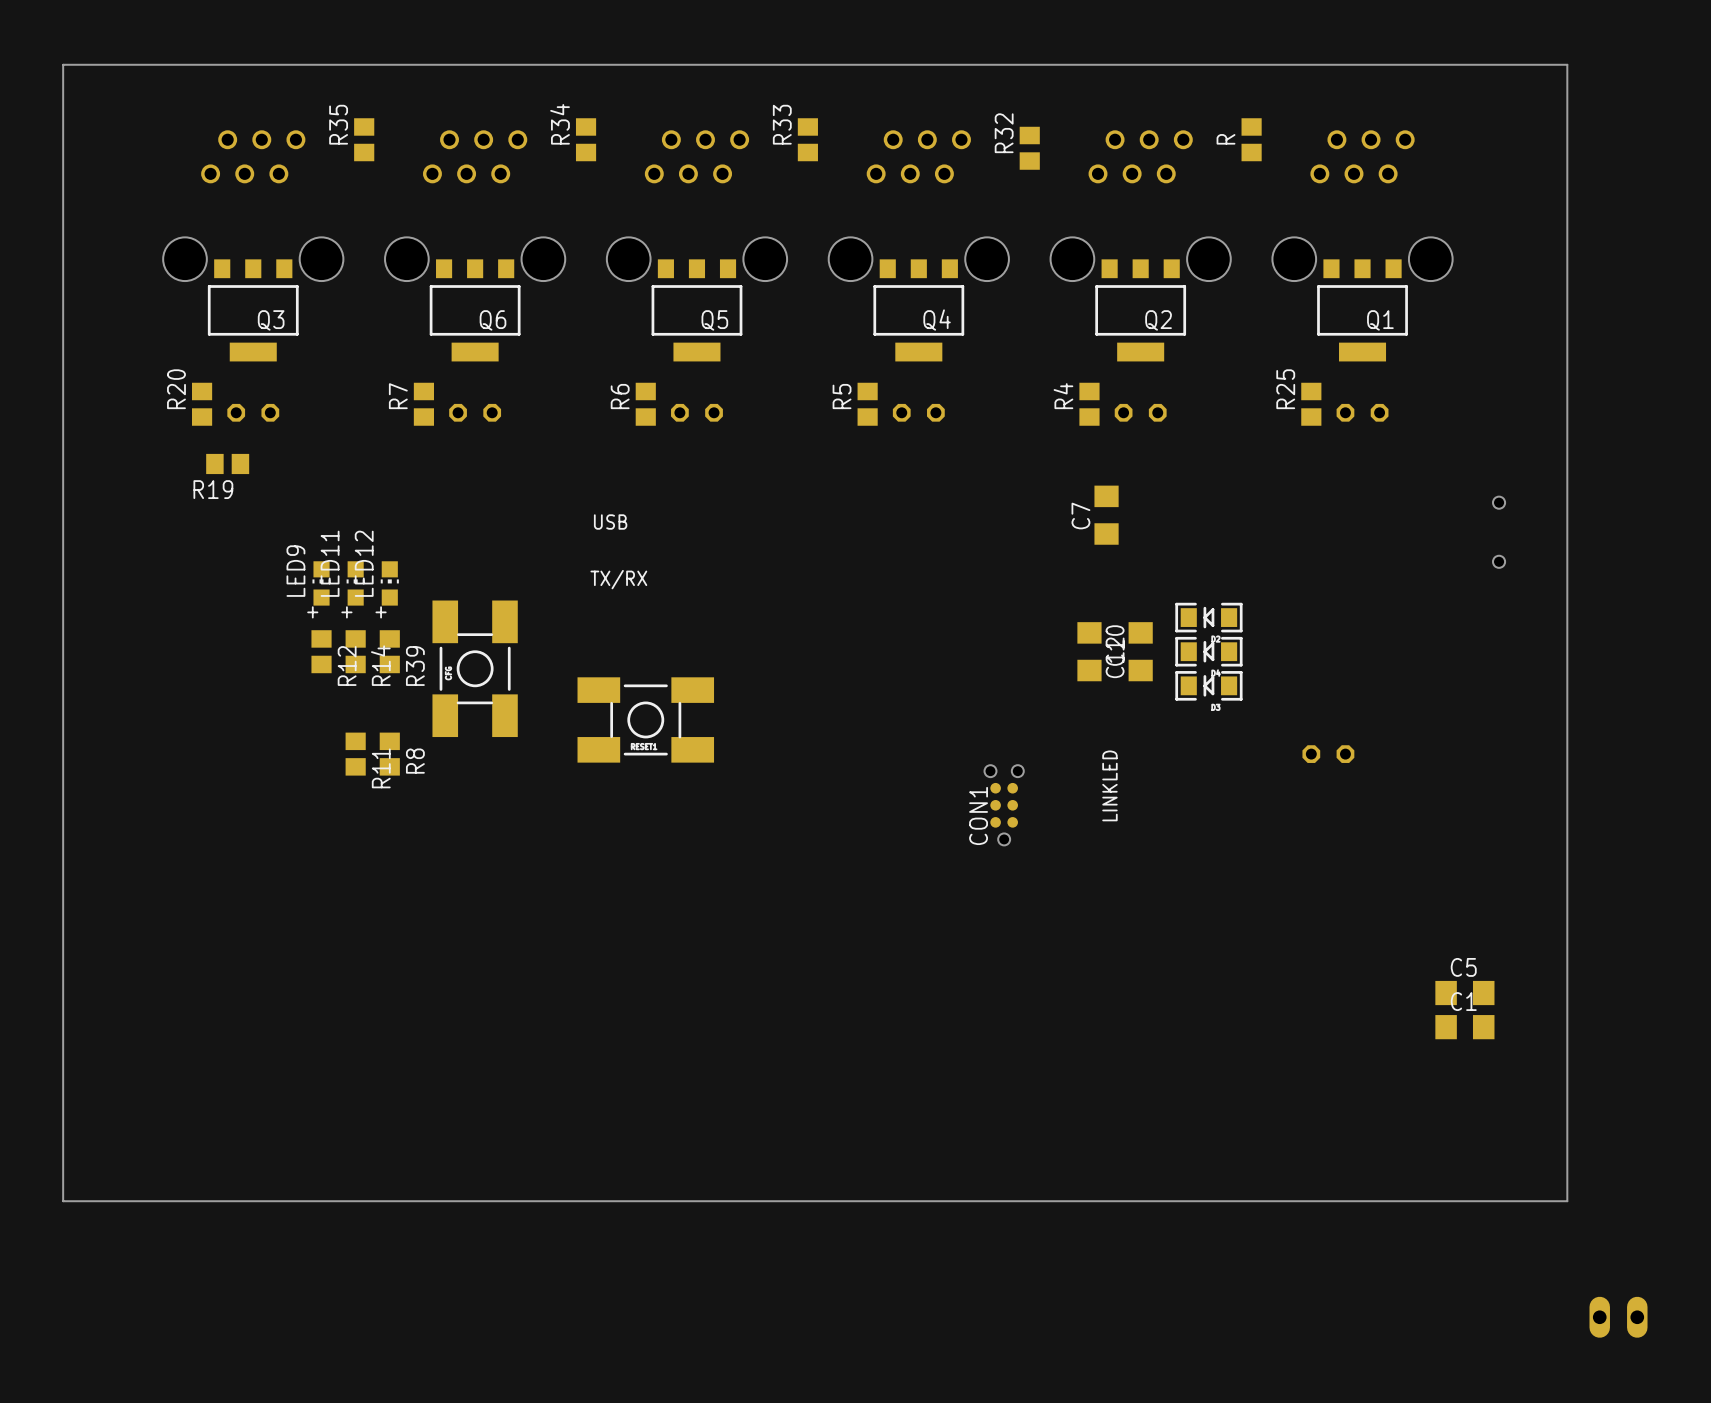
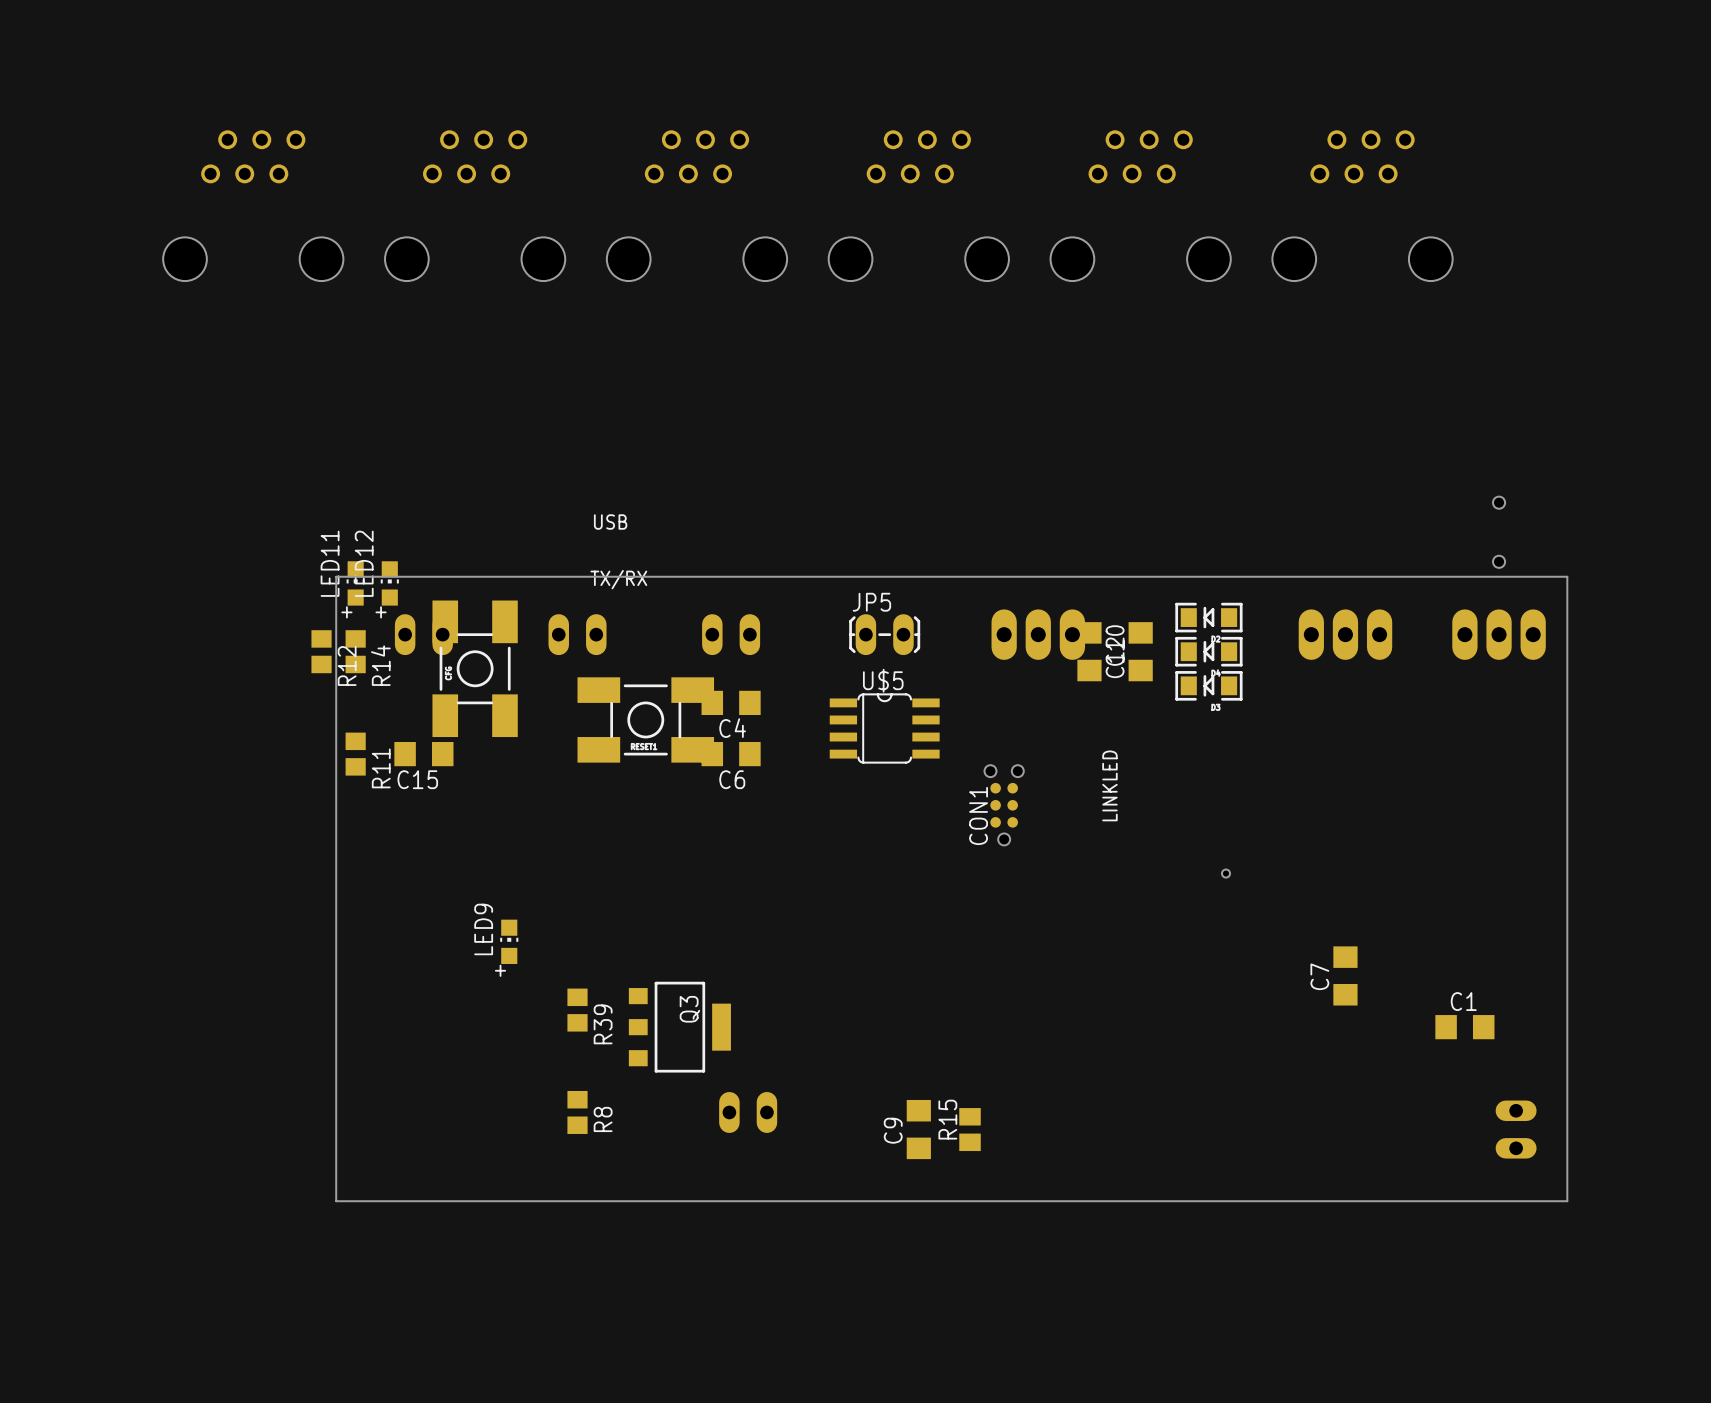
R35: (364, 139) -> none
R34: (586, 139) -> none
R33: (807, 139) -> none
R: (1251, 139) -> none
R32: (1029, 148) -> none
Q3 rotation: 0° (253, 310) -> 90° counterclockwise (679, 1027)
Q3 position: (253, 310) -> (679, 1027)
Q6: (475, 310) -> none
Q5: (696, 310) -> none
Q4: (918, 310) -> none
Q2: (1140, 310) -> none
Q1: (1362, 310) -> none
R20: (202, 404) -> none
R7: (423, 404) -> none
R6: (645, 404) -> none
R5: (867, 404) -> none
R4: (1089, 404) -> none
R25: (1311, 404) -> none
part: (253, 412) -> none
part: (475, 412) -> none
part: (696, 412) -> none
part: (918, 412) -> none
part: (1140, 412) -> none
part: (1362, 412) -> none
R19: (227, 463) -> none
C7 position: (1106, 515) -> (1345, 975)
board edge: (1567, 576) (1567, 64) (63, 64) (63, 1201) (336, 1201) -> (1567, 576) (336, 576) (336, 1201)
LED9 position: (321, 583) -> (509, 941)
part: none -> (423, 634)
part: none -> (577, 634)
part: none -> (731, 634)
JP5: none -> (884, 634)
part: none -> (1038, 634)
part: none -> (1345, 634)
part: none -> (1499, 634)
R39 position: (389, 651) -> (577, 1010)
C4: none -> (731, 702)
U$5: none -> (884, 728)
R8 position: (389, 754) -> (577, 1112)
C15: none -> (423, 754)
C6: none -> (731, 754)
part: (1328, 754) -> none
hole: none -> (1226, 873)
C5: (1464, 993) -> none
part: none -> (748, 1112)
C9: none -> (918, 1129)
R15: none -> (970, 1129)
part rotation: 0° (1618, 1317) -> 90° clockwise (1516, 1129)
part position: (1618, 1317) -> (1516, 1129)

